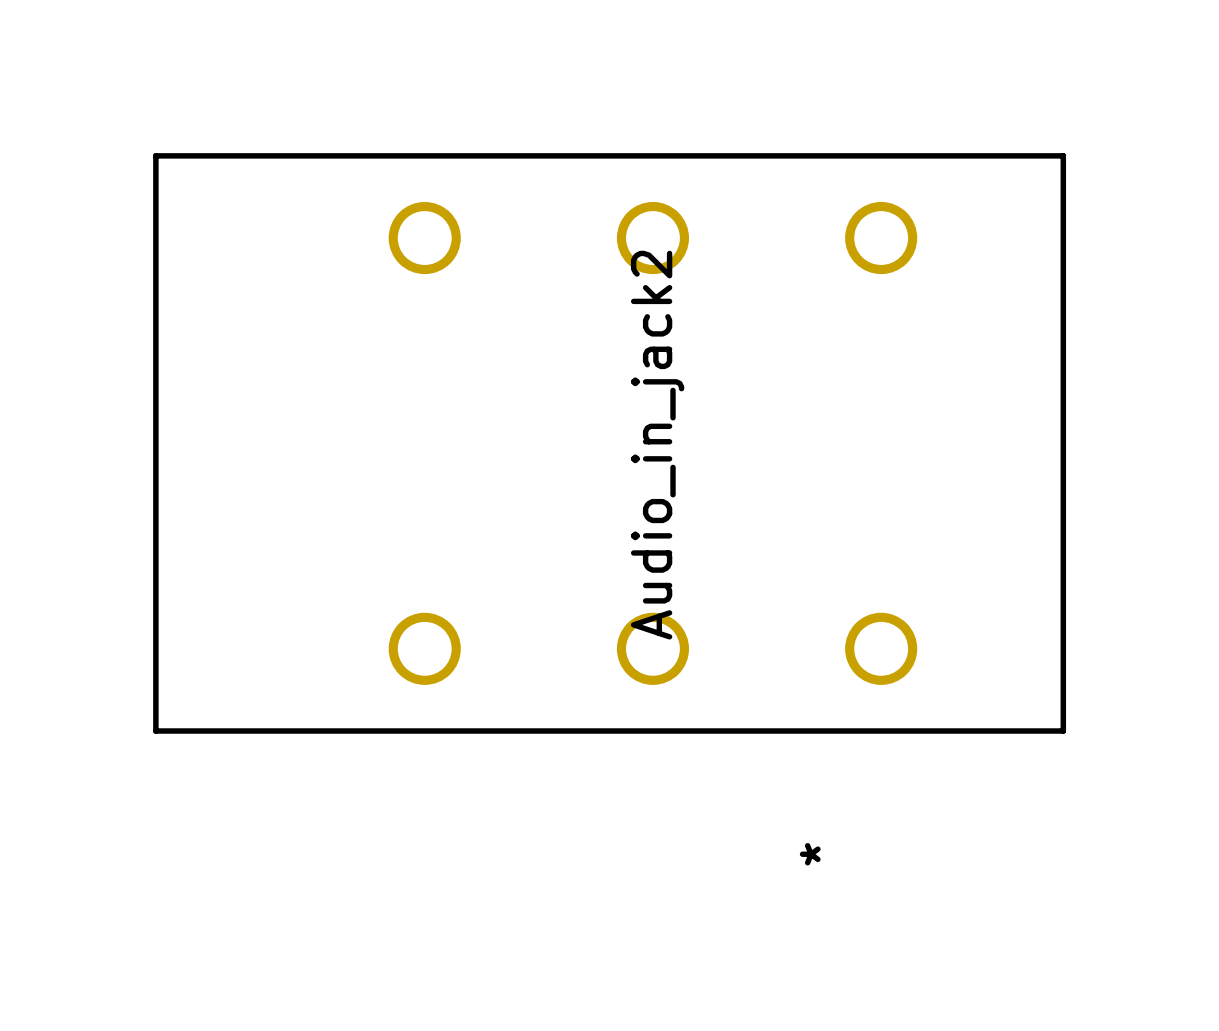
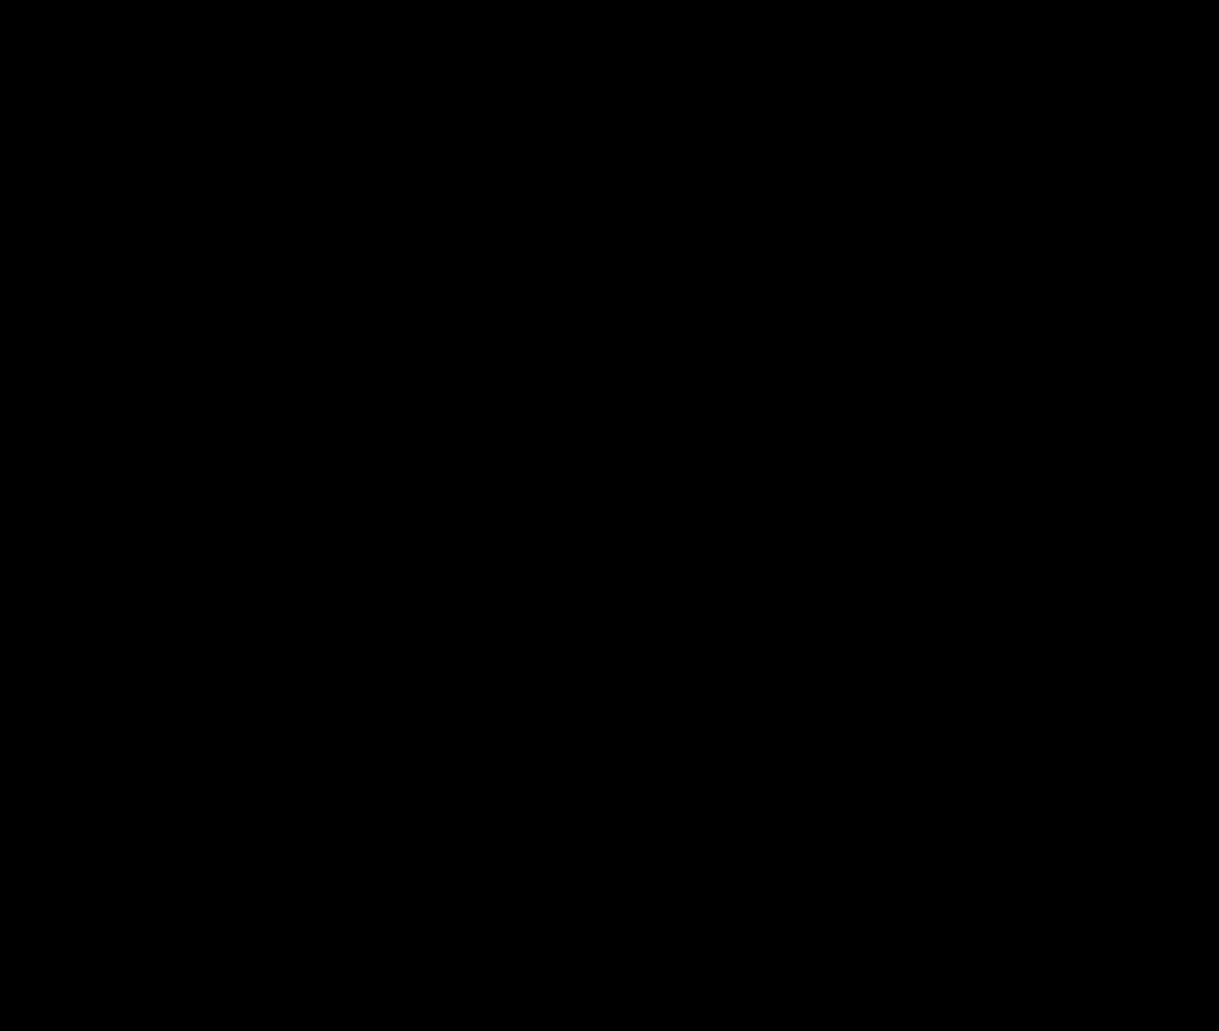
Audio_in_jack2: (609, 443) -> none

